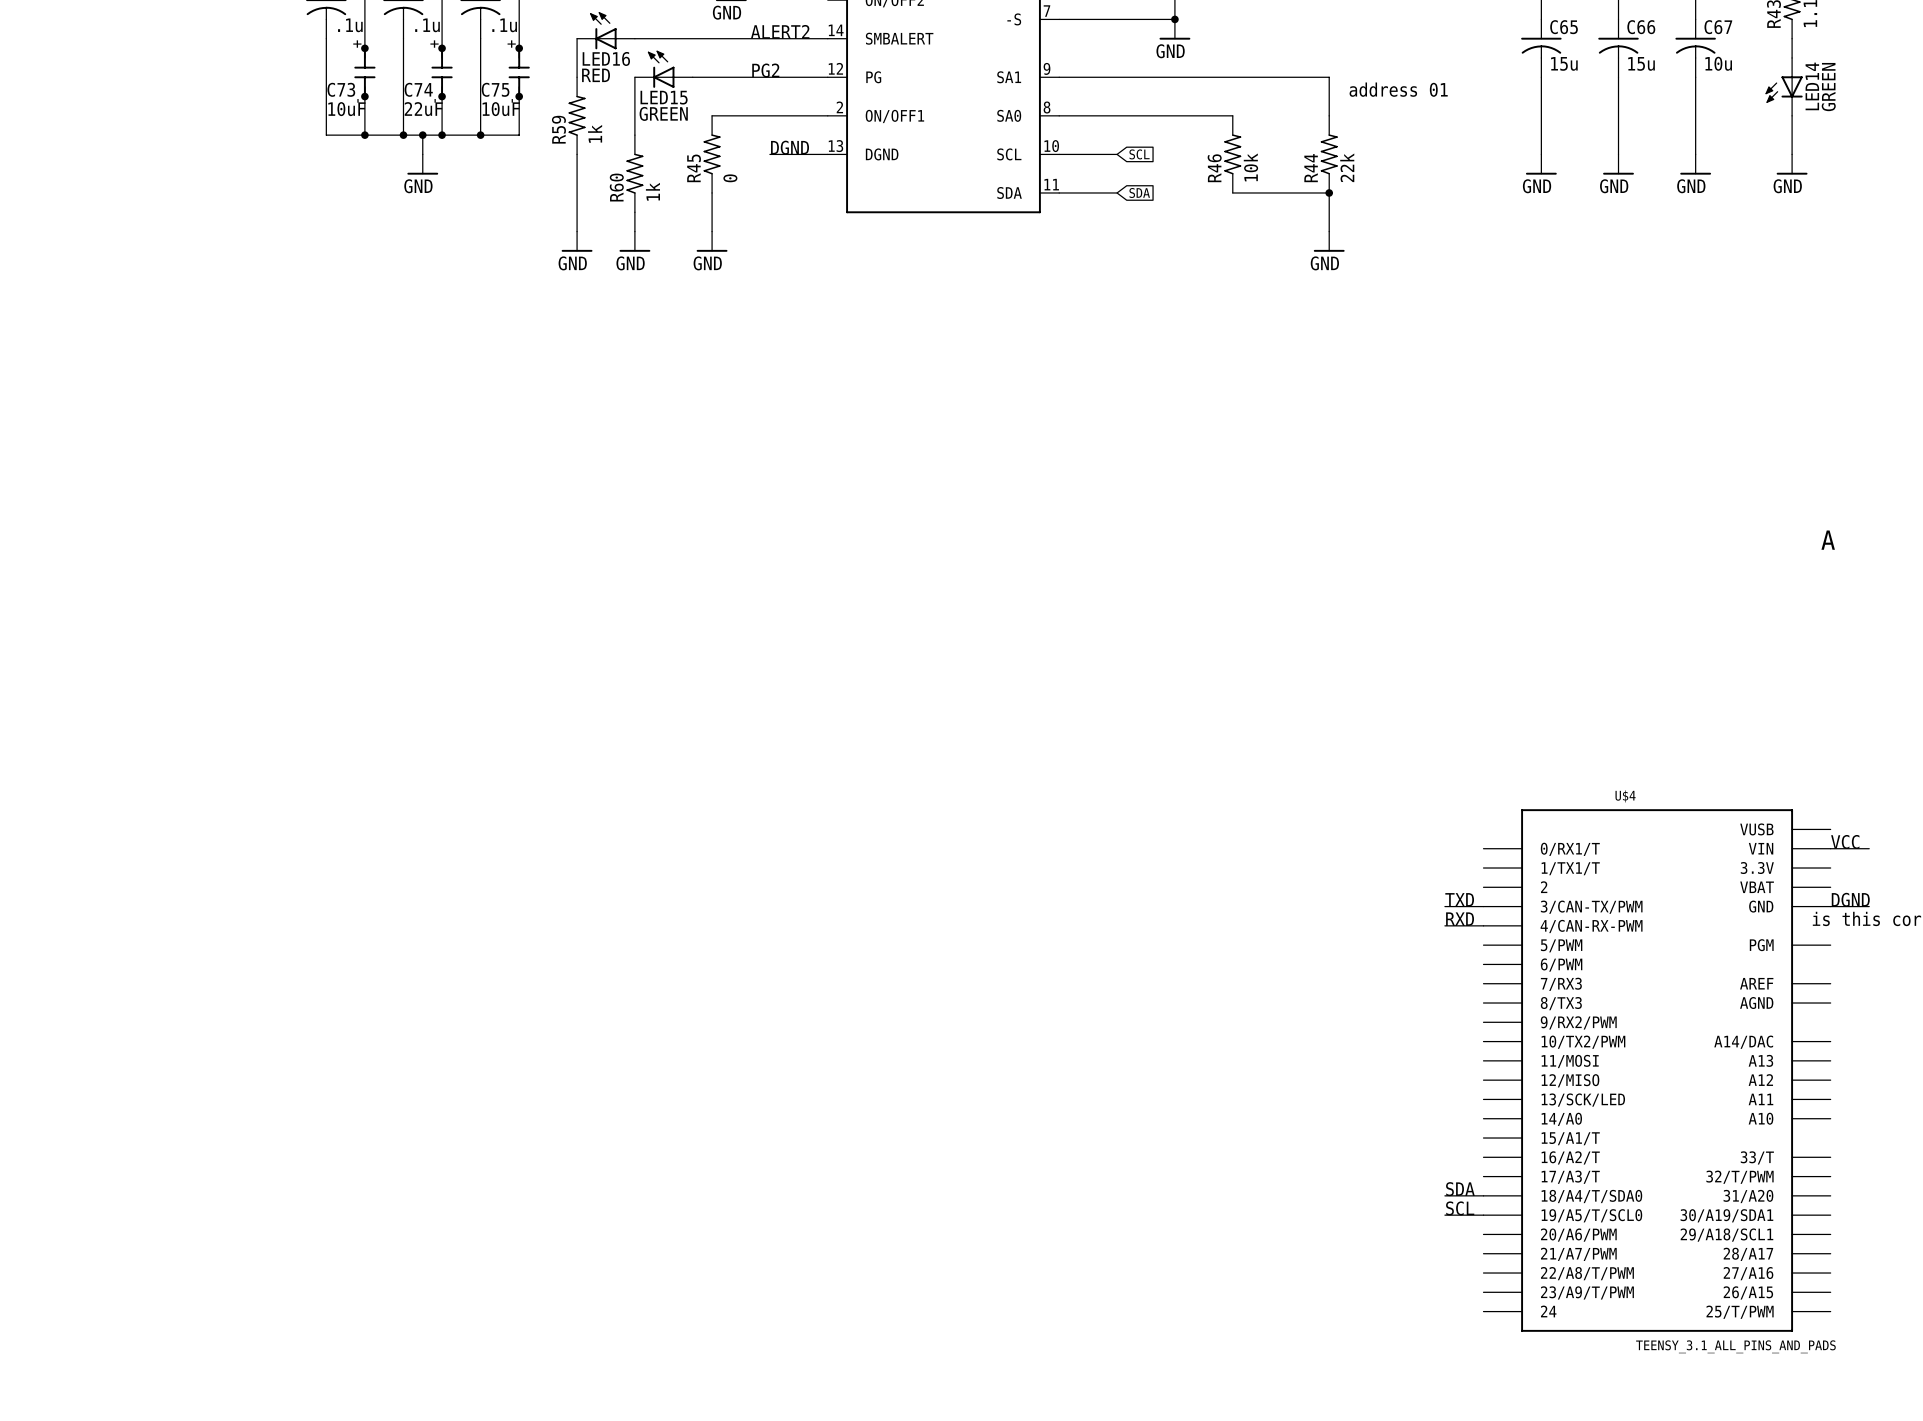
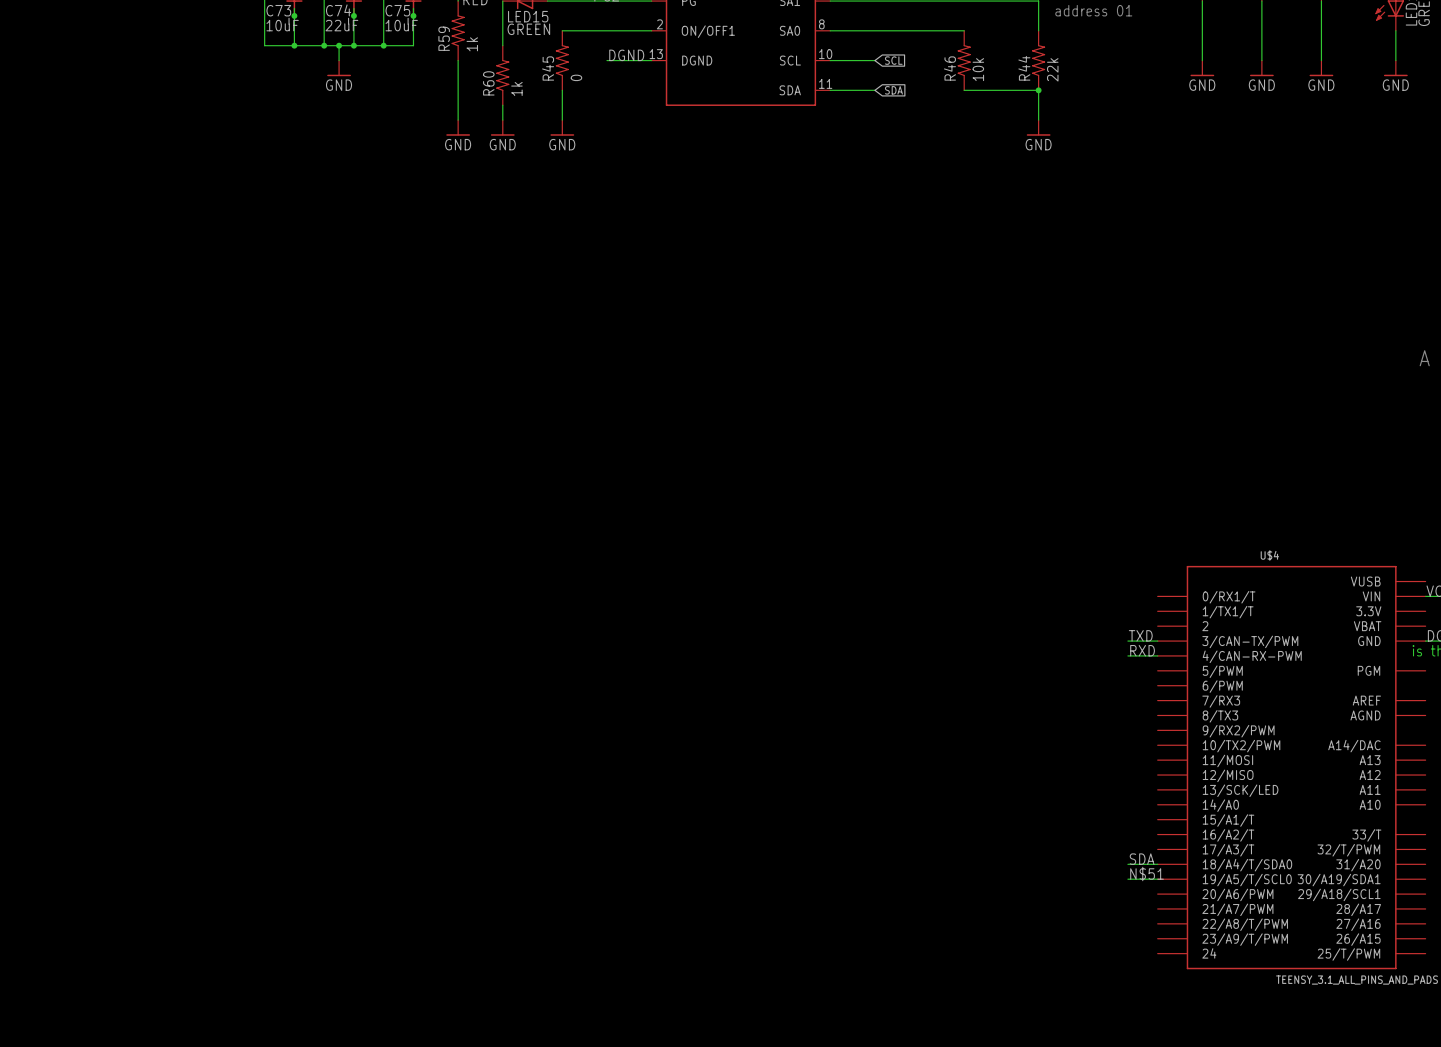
label: SCL (1460, 1208) -> N$51 (1147, 874)

